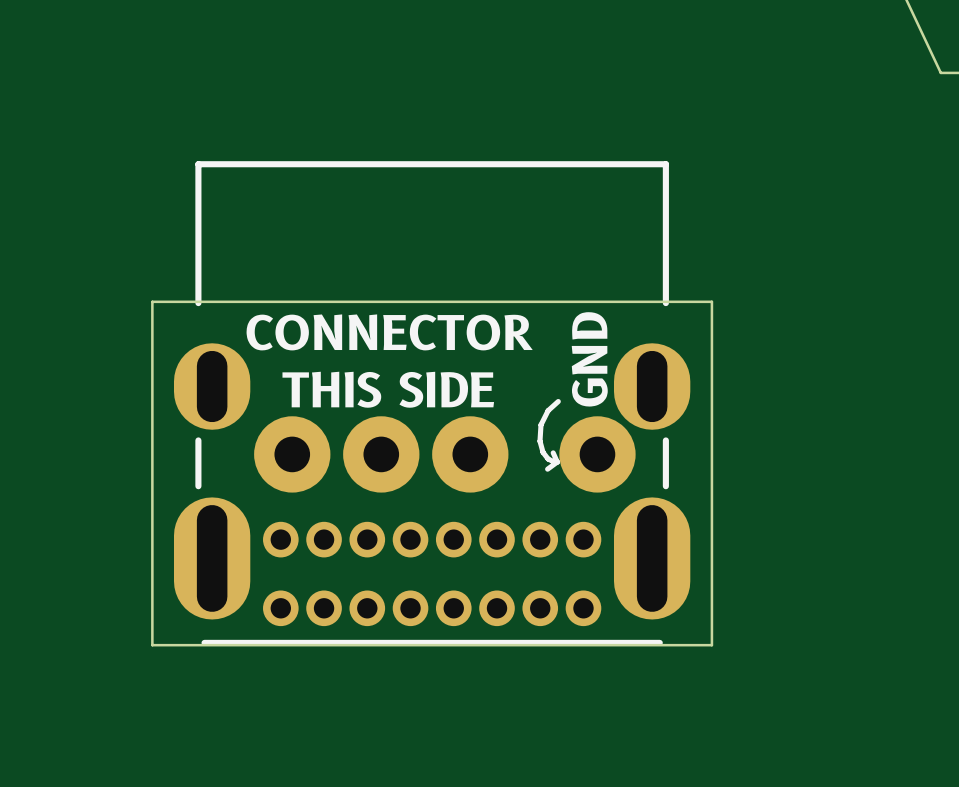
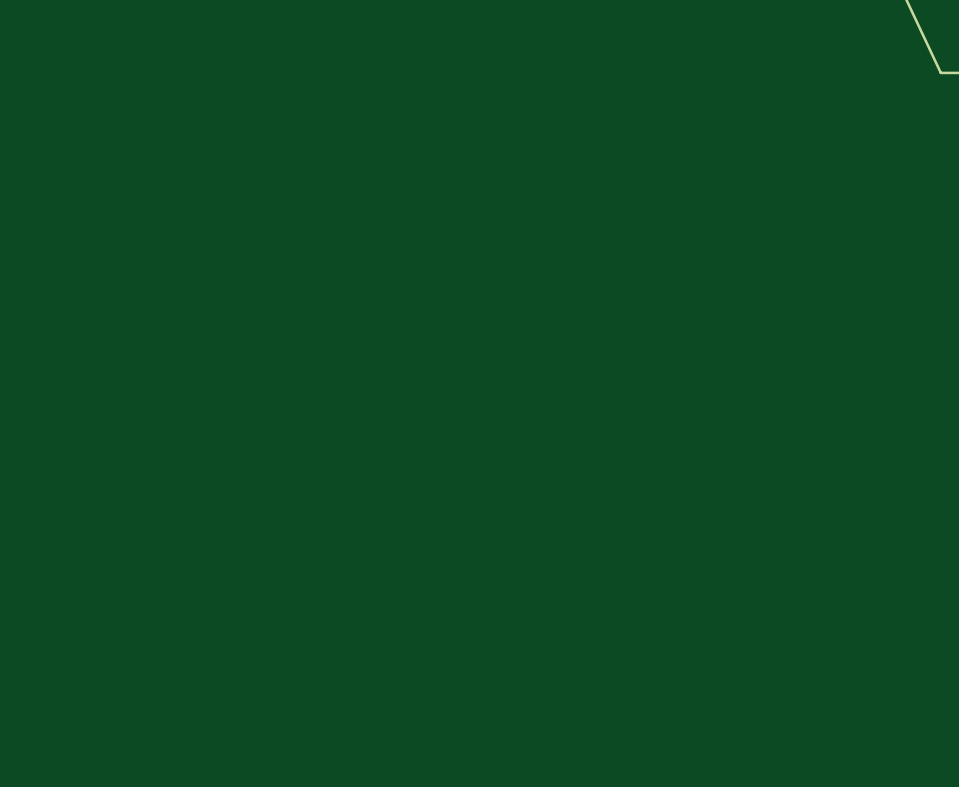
board edge: (152, 301) (711, 301) (711, 645) (152, 645) (152, 301) -> none
text: CONNECTOR (389, 332) -> none
text: GND (589, 359) -> none
text: THIS SIDE (388, 389) -> none
line: (558, 401) (548, 410) (541, 424) (539, 441) (543, 452) (548, 459) (557, 462) -> none
part: (432, 403) -> none
line: (553, 452) (557, 462) -> none
part: (292, 454) -> none
part: (381, 454) -> none
part: (470, 454) -> none
part: (597, 454) -> none
line: (557, 462) (547, 469) -> none

